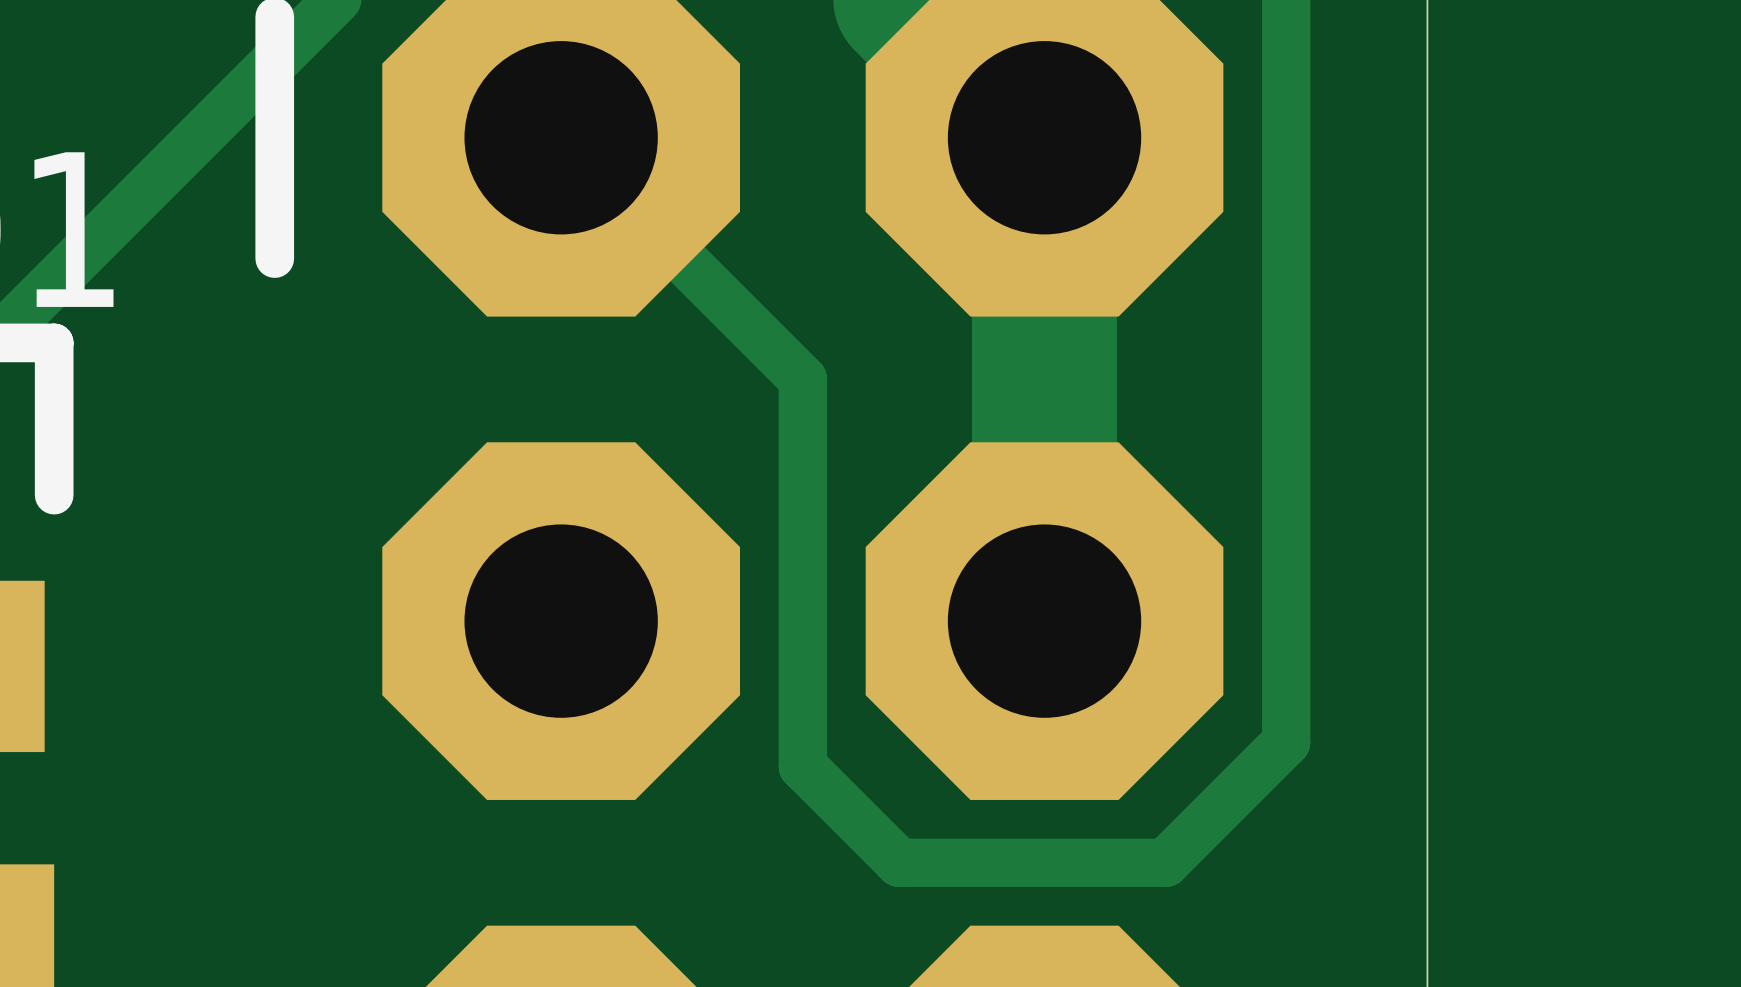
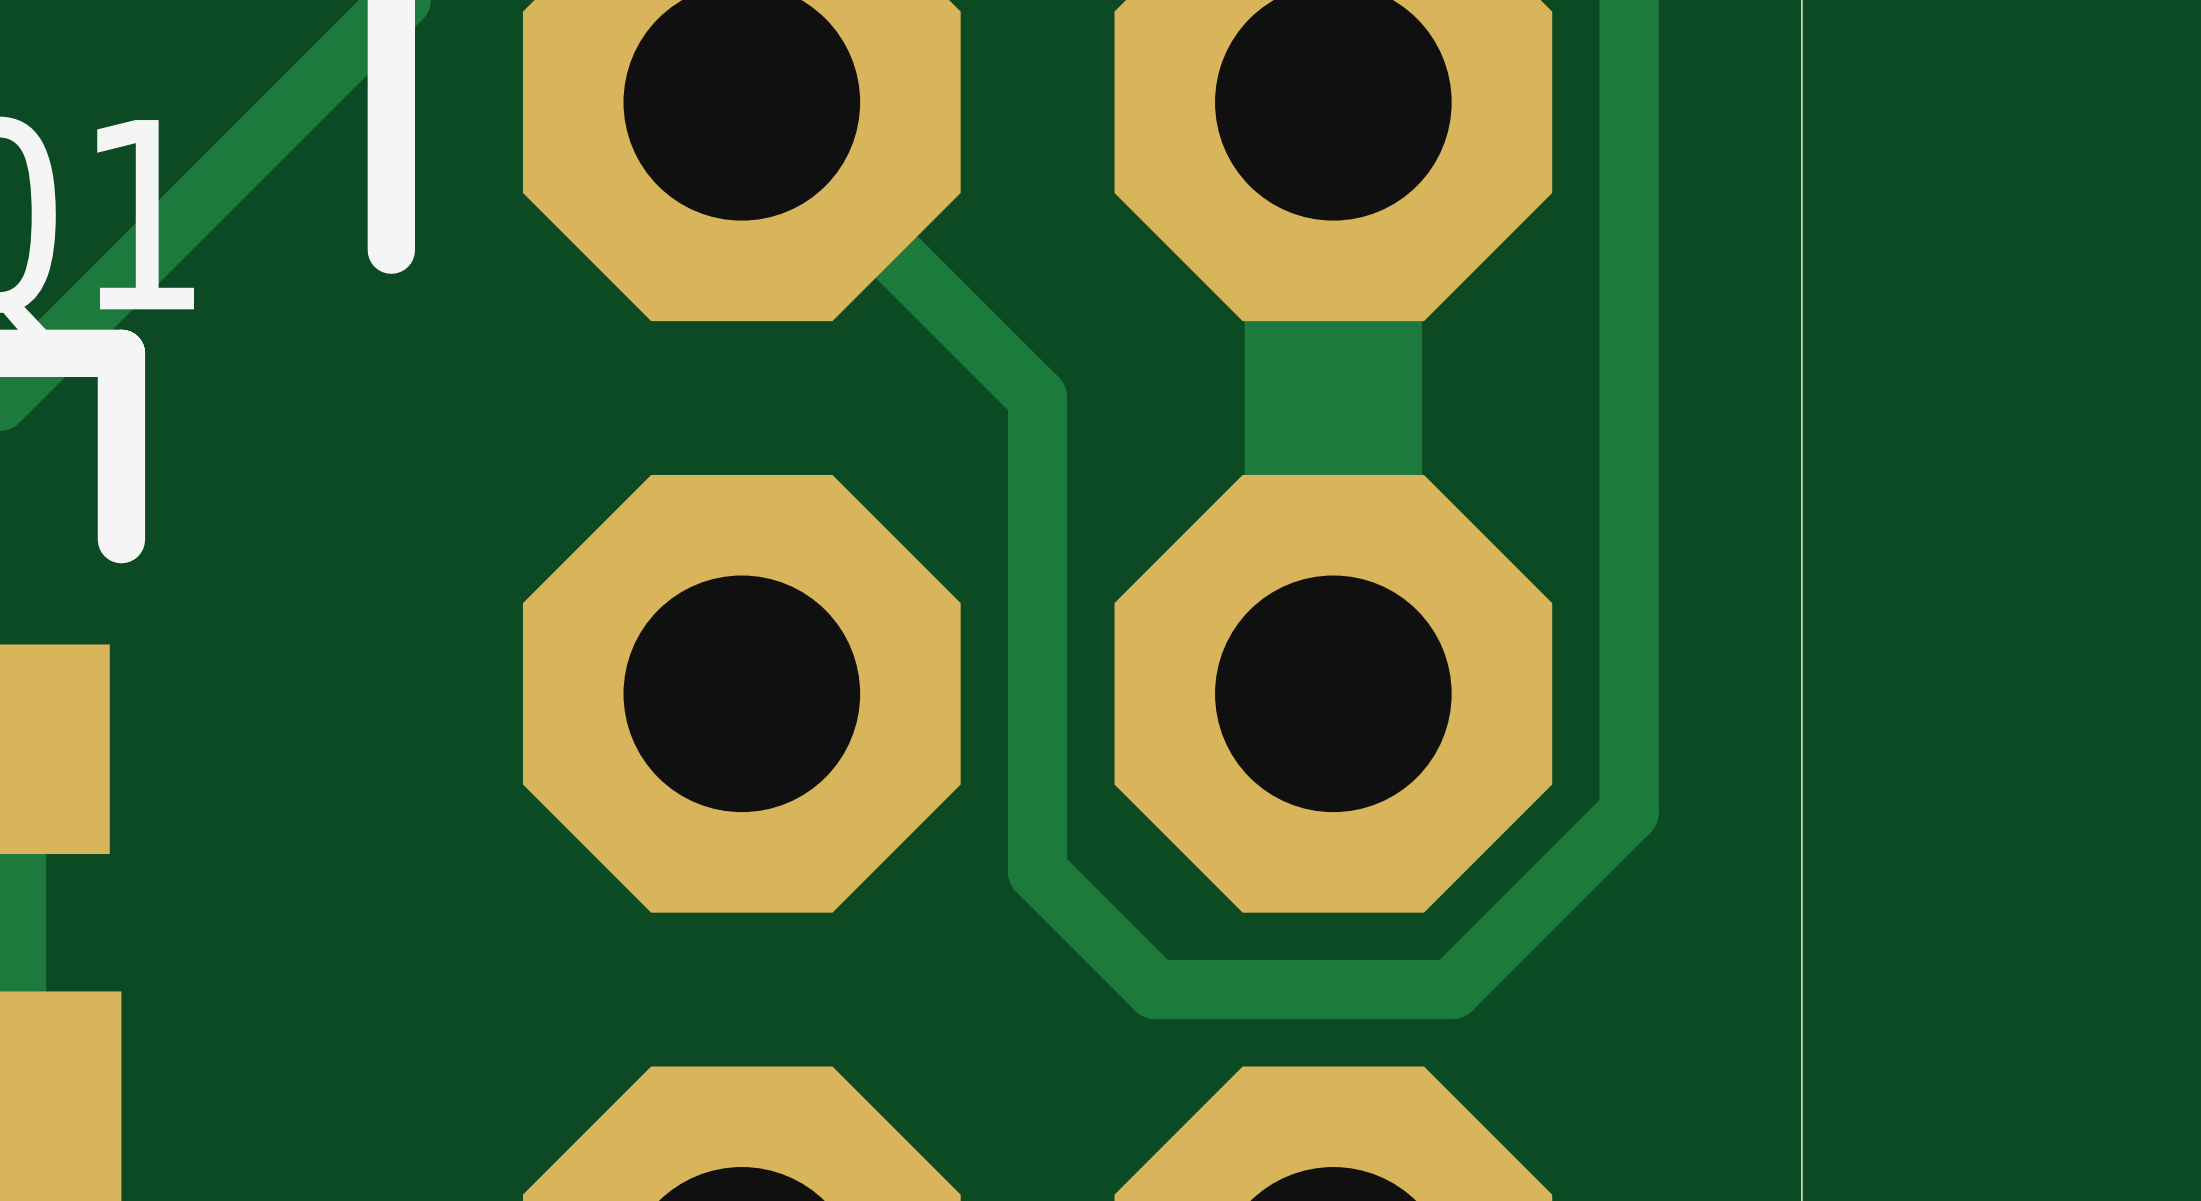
track: (1286, 717) (1286, 741) (1165, 862) (1141, 862) -> (1629, 812) (1451, 989)

